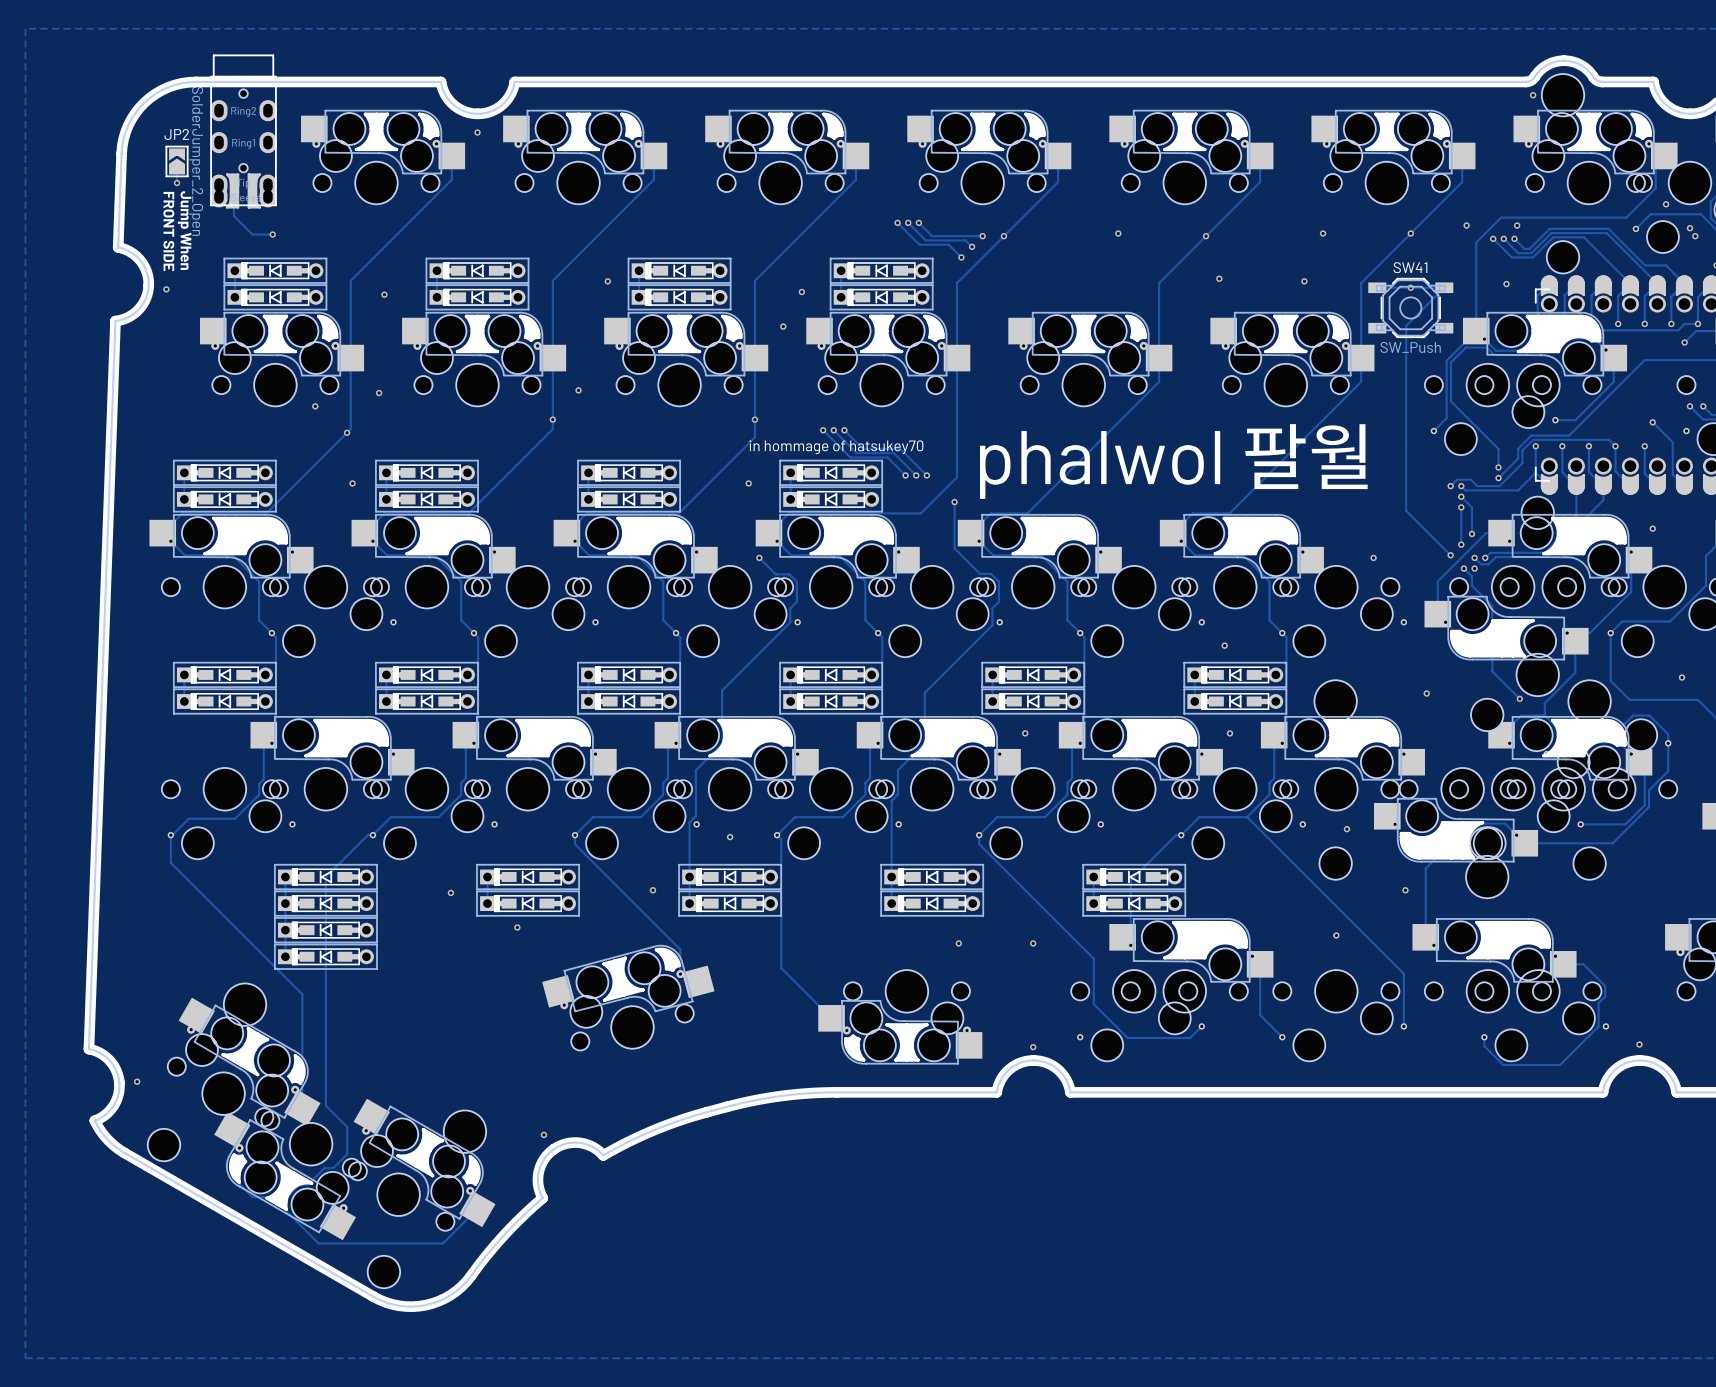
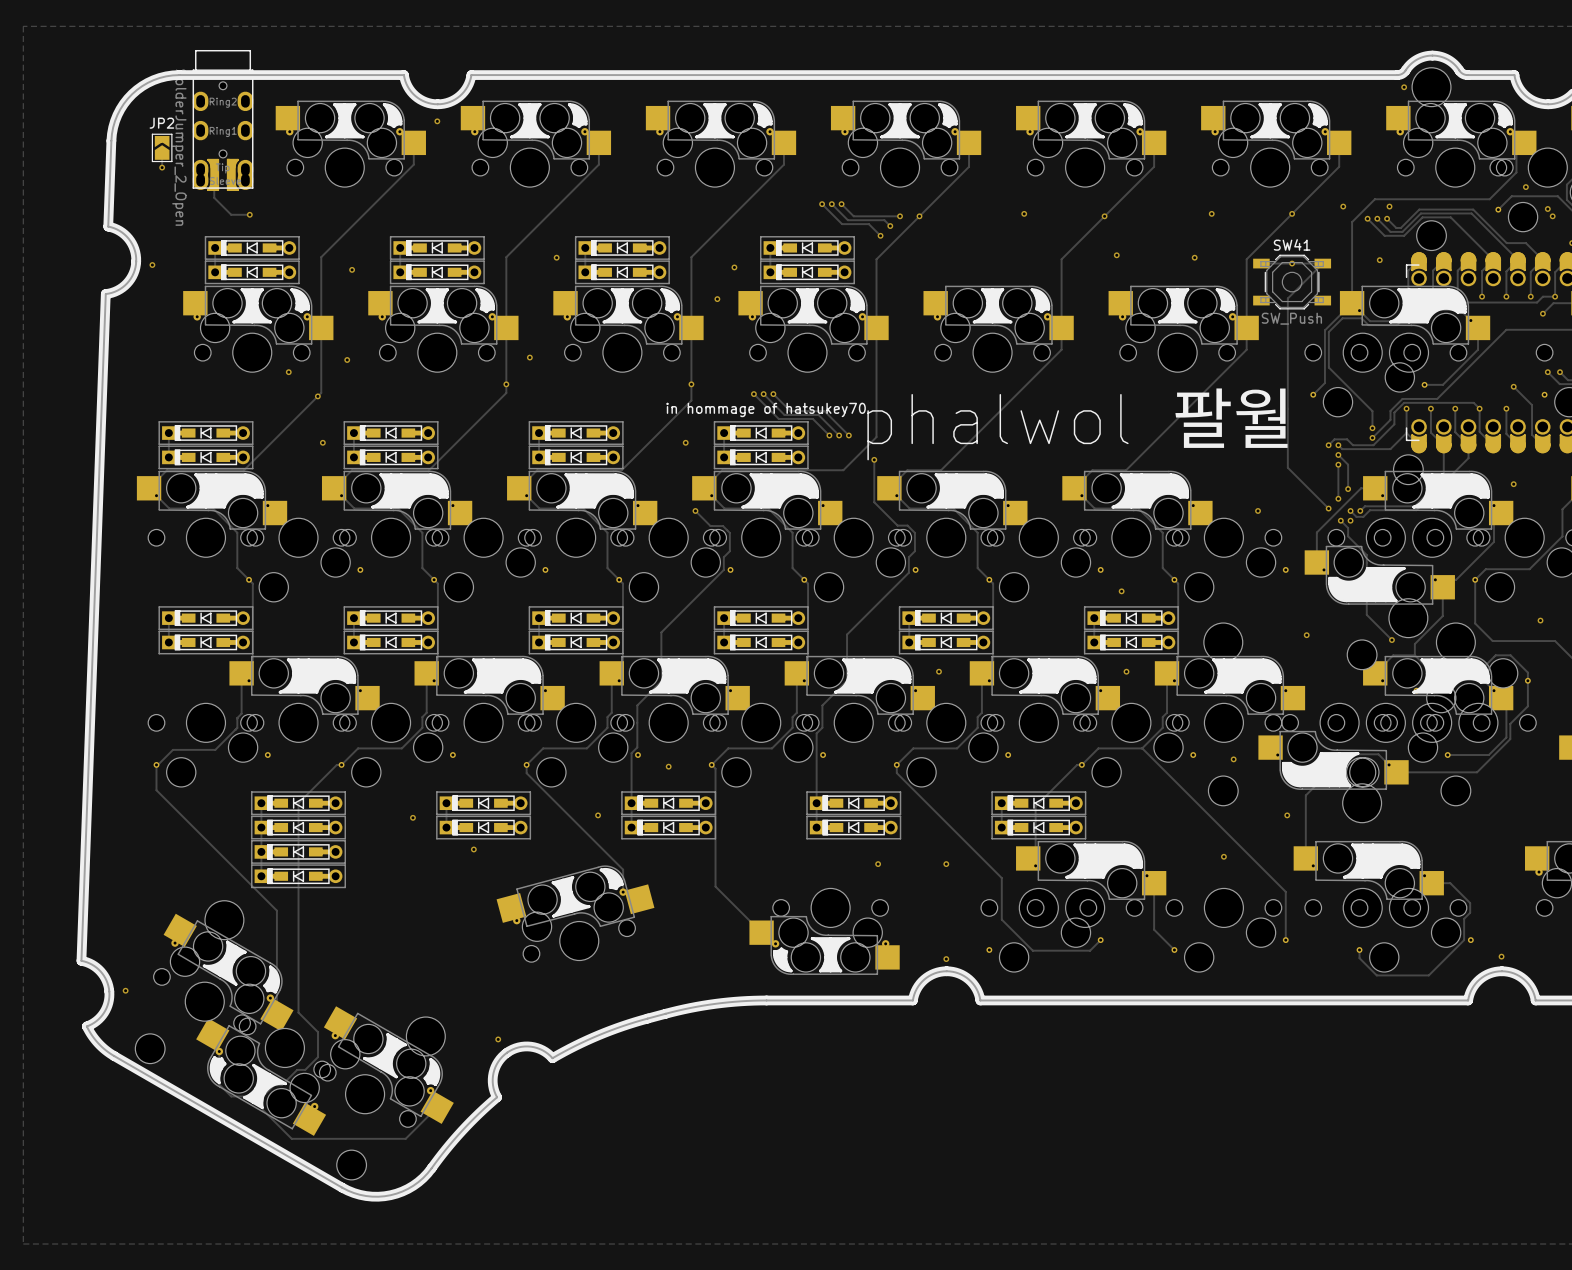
text: Jump When (184, 230) -> none
text: FRONT SIDE (168, 231) -> none

